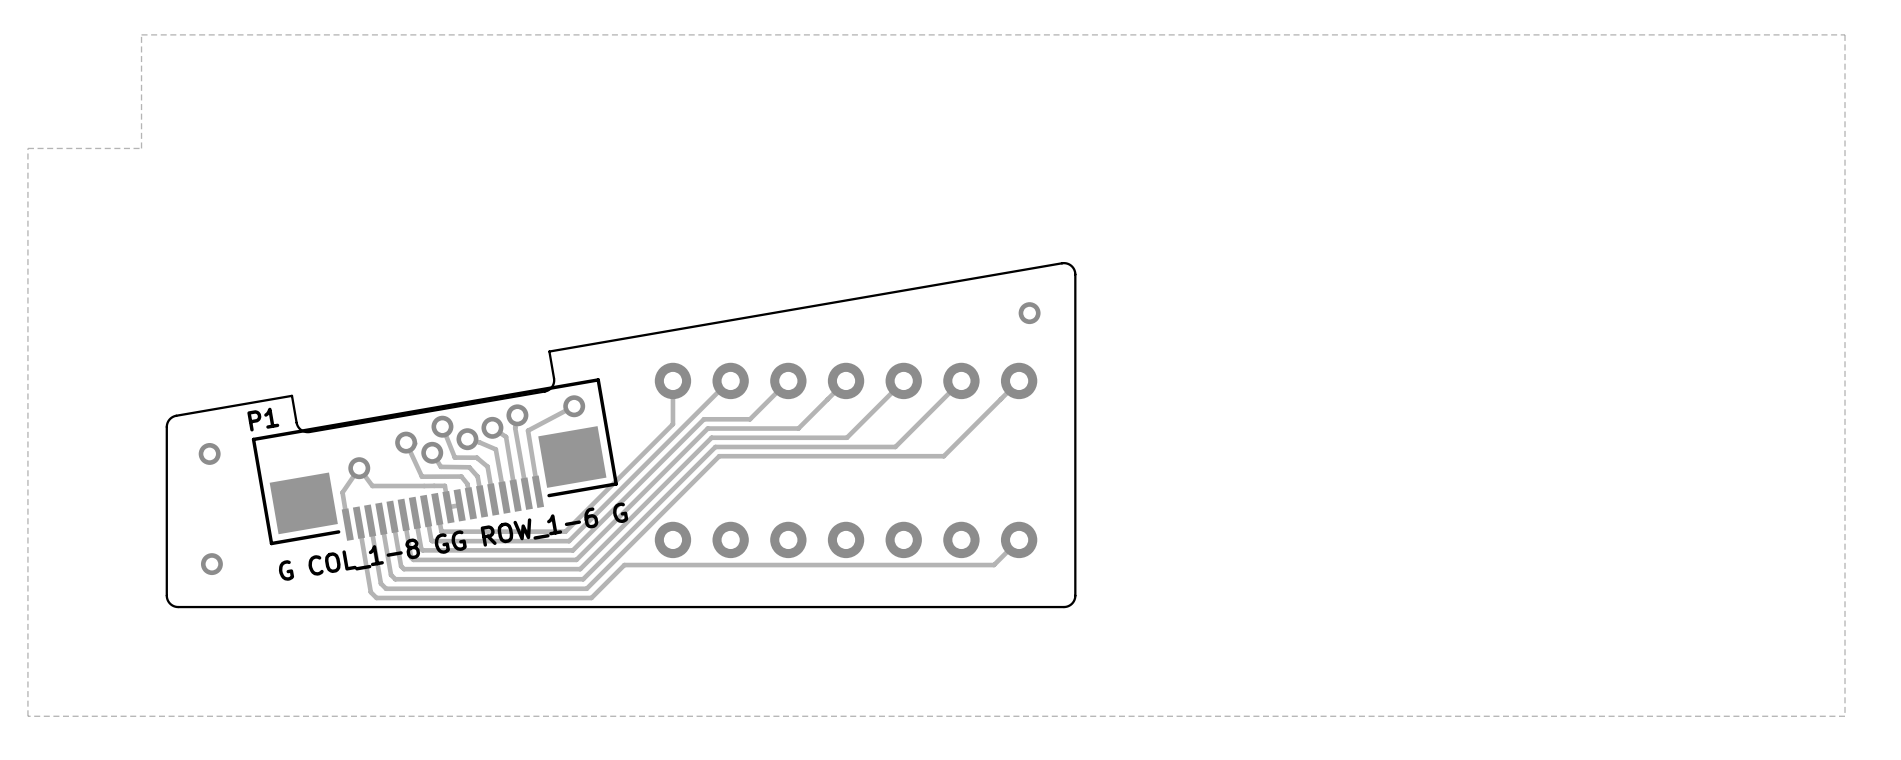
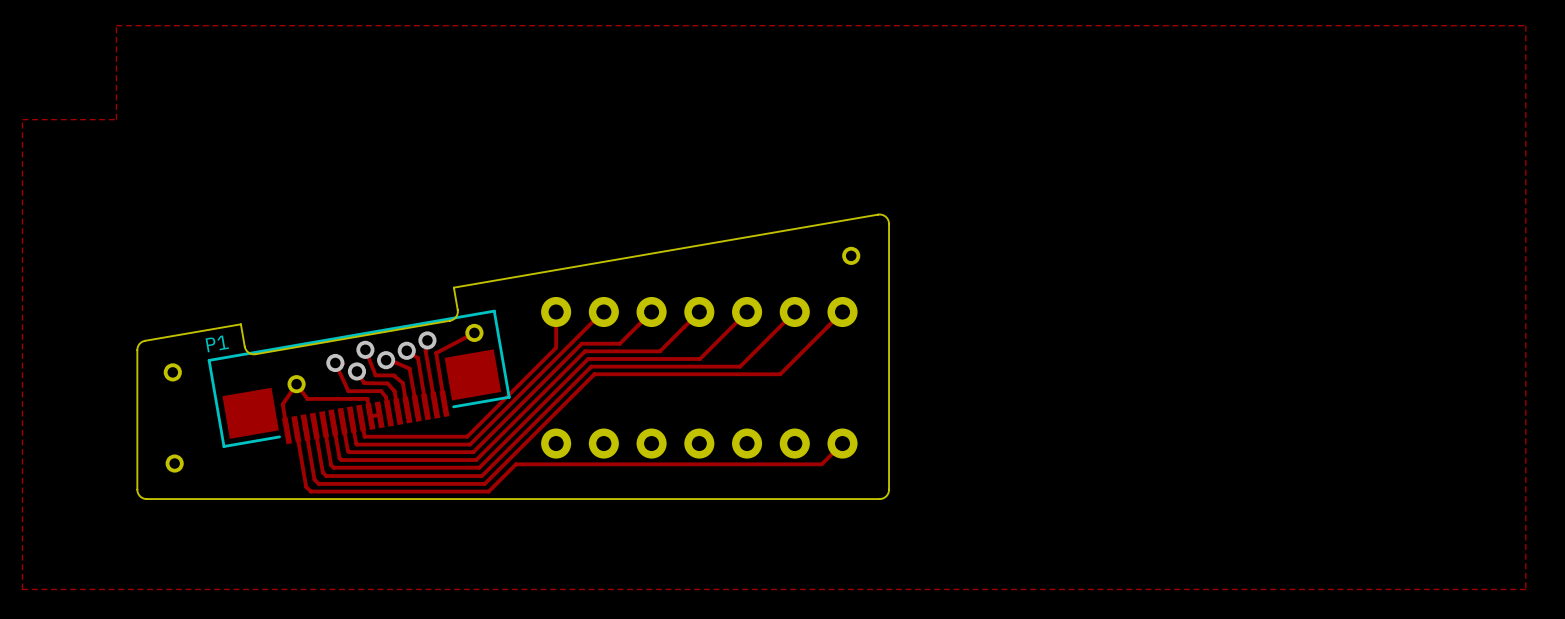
text: G COL_1-8 GG ROW_1-6 G (453, 541) -> none

